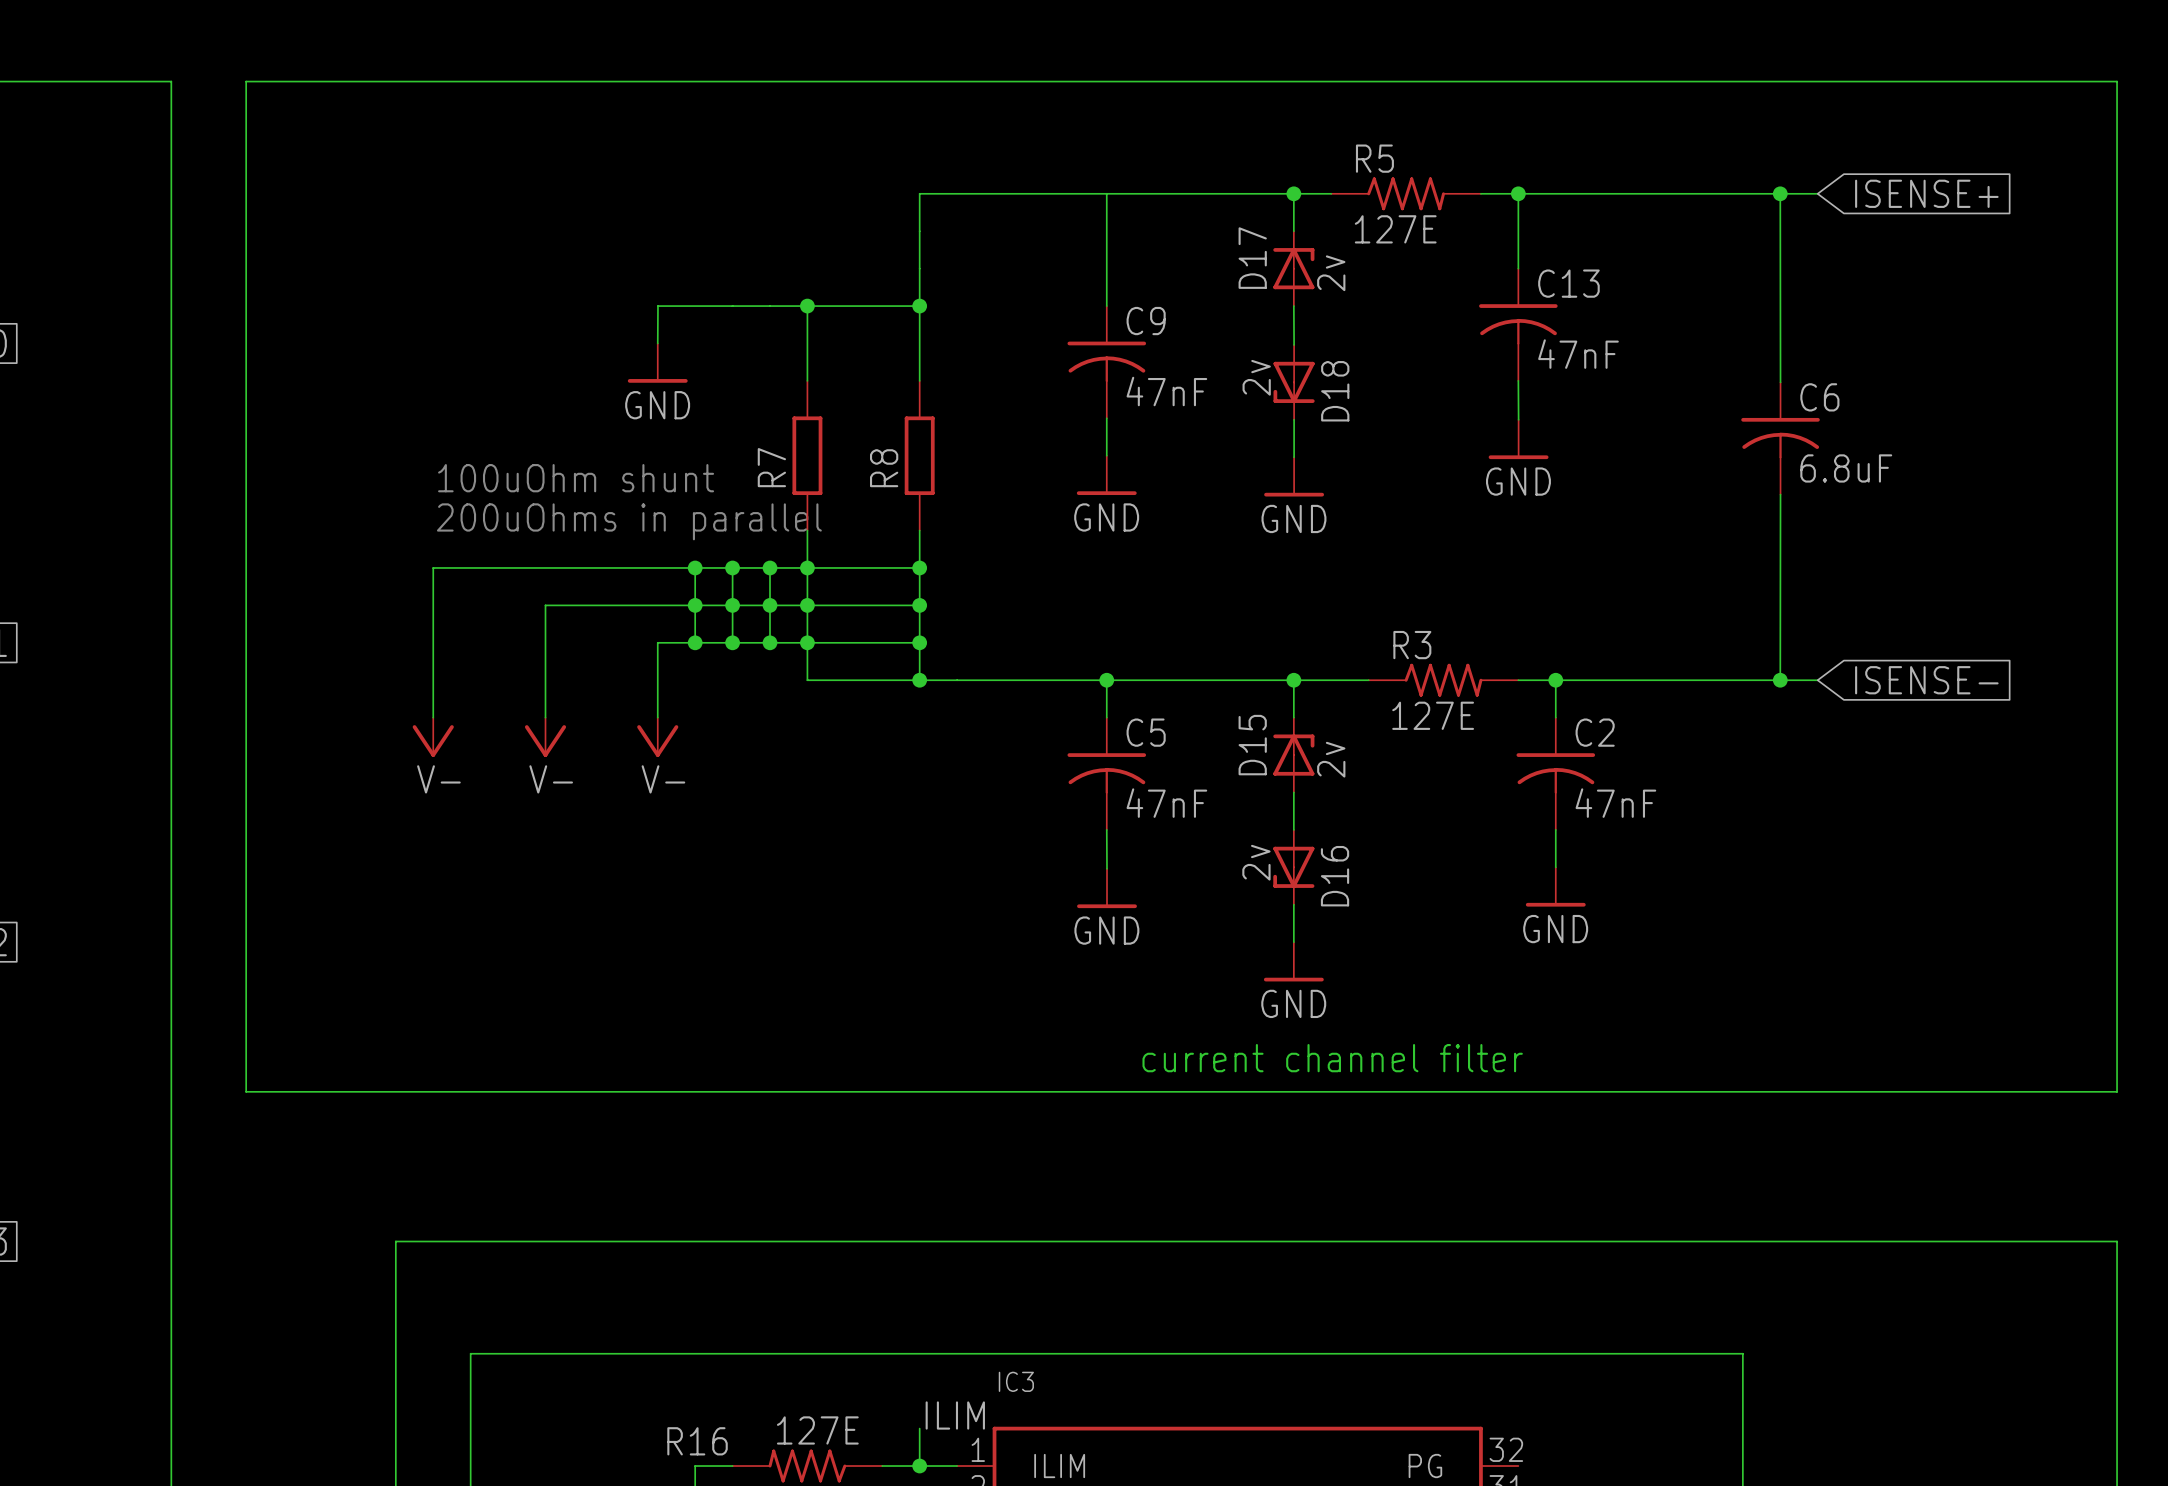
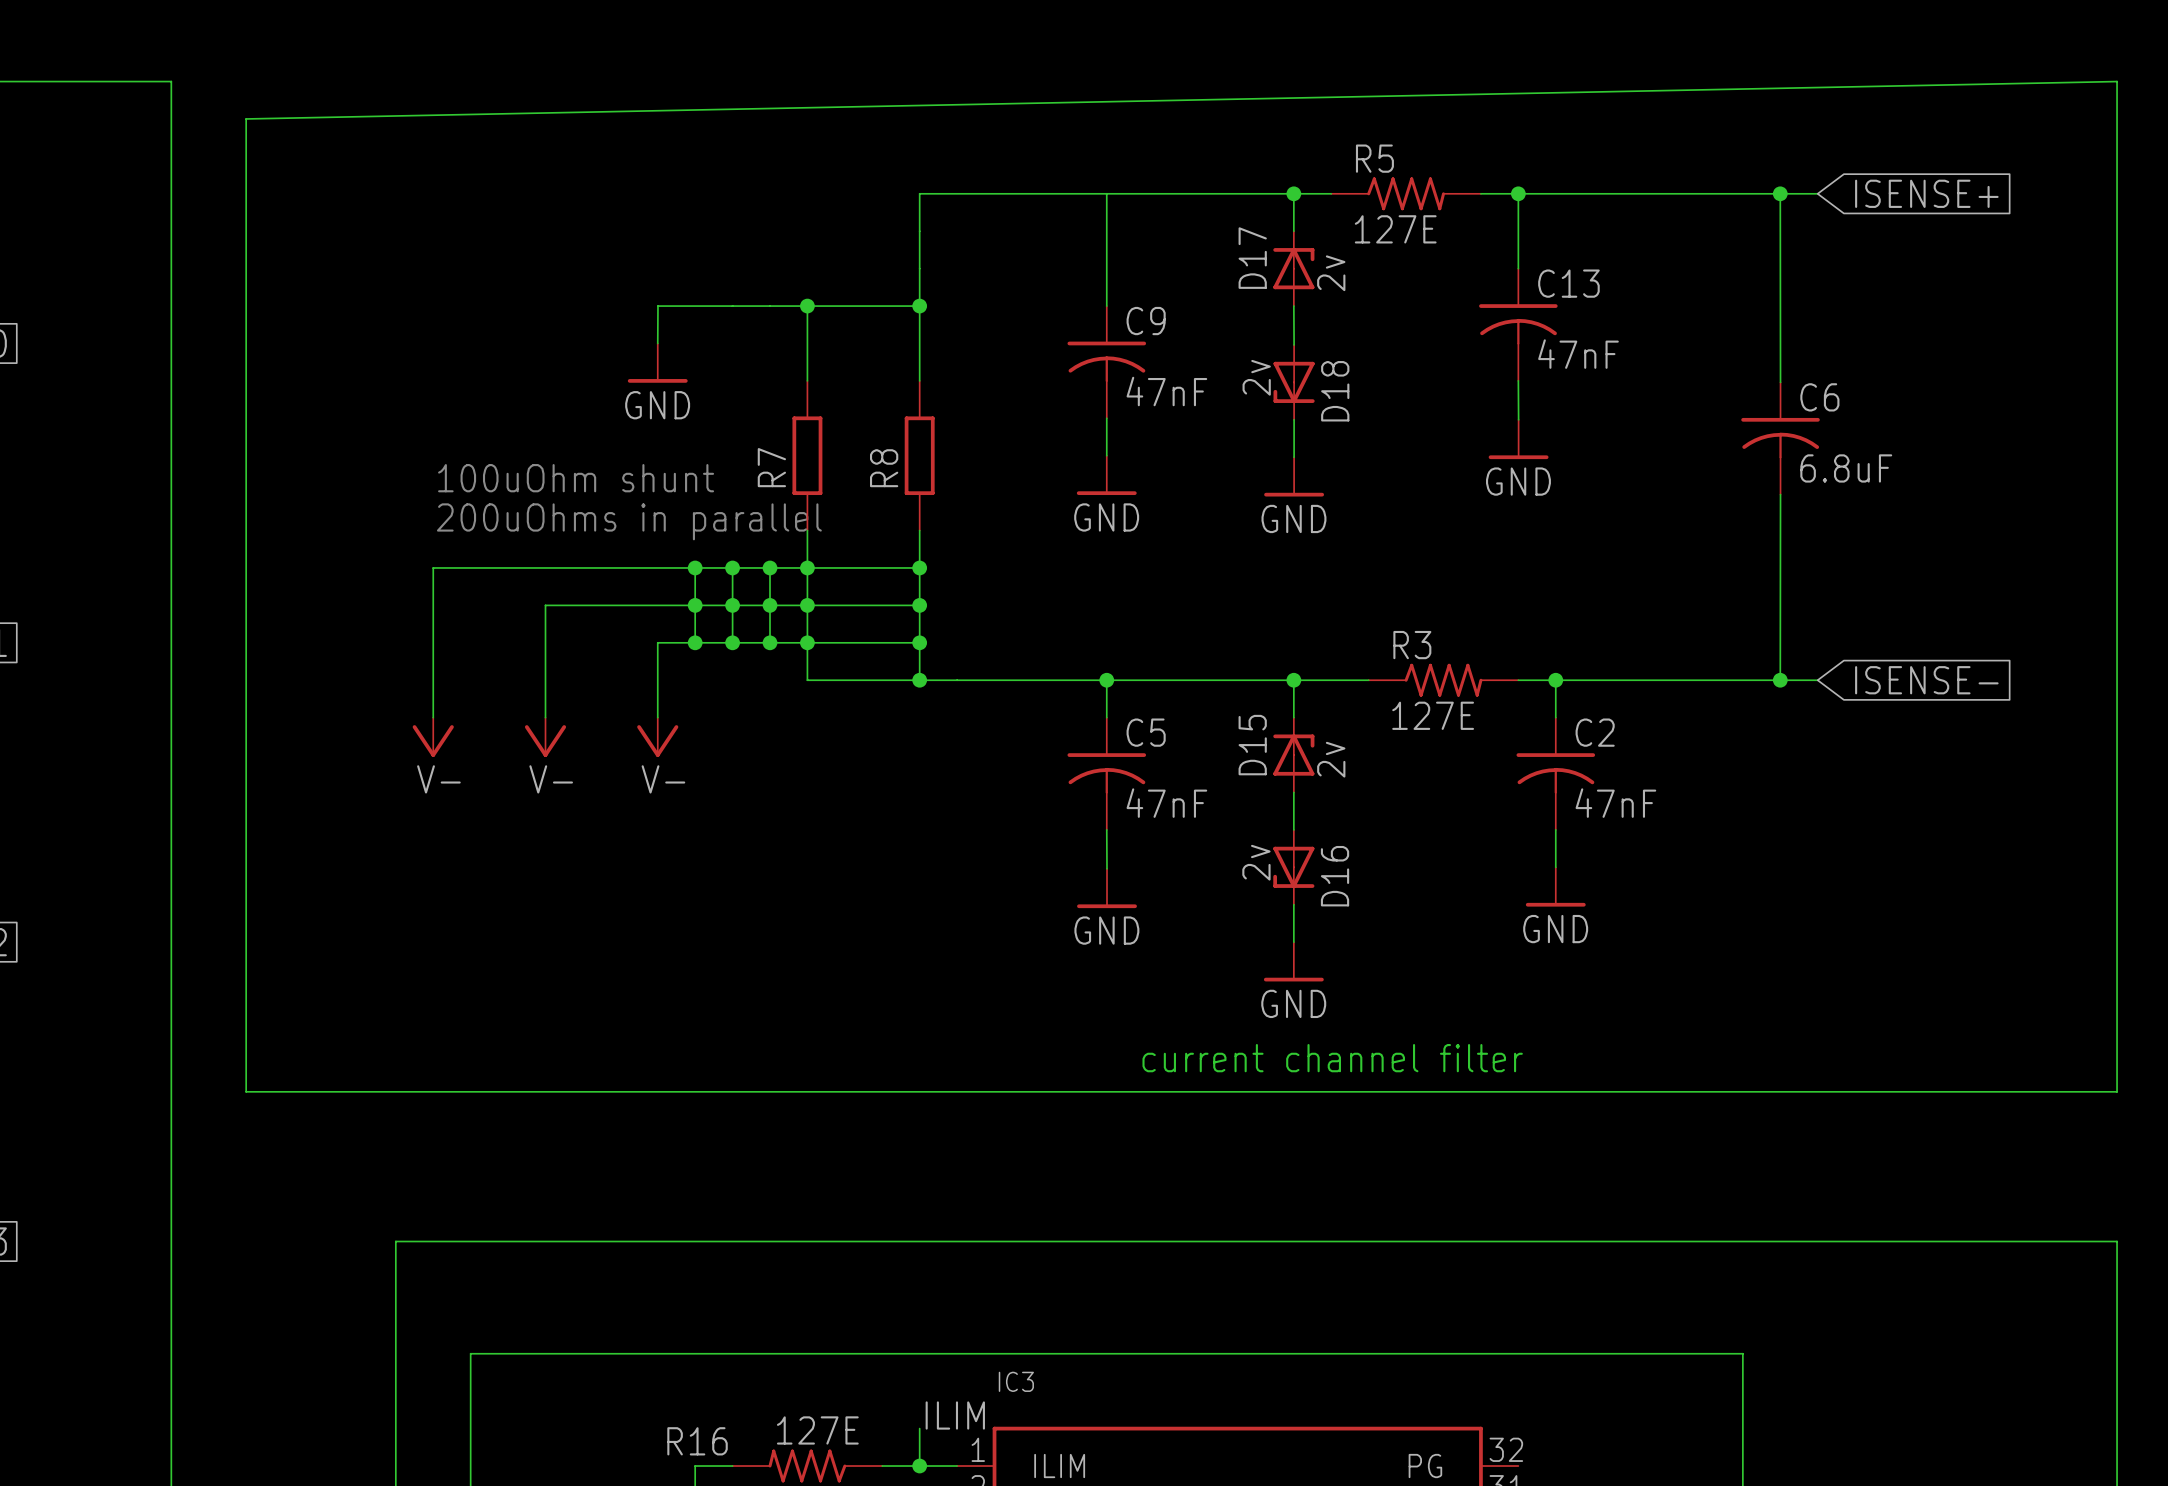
wire: (2117, 81) (246, 81) (246, 118) -> (2117, 81) (246, 118)

